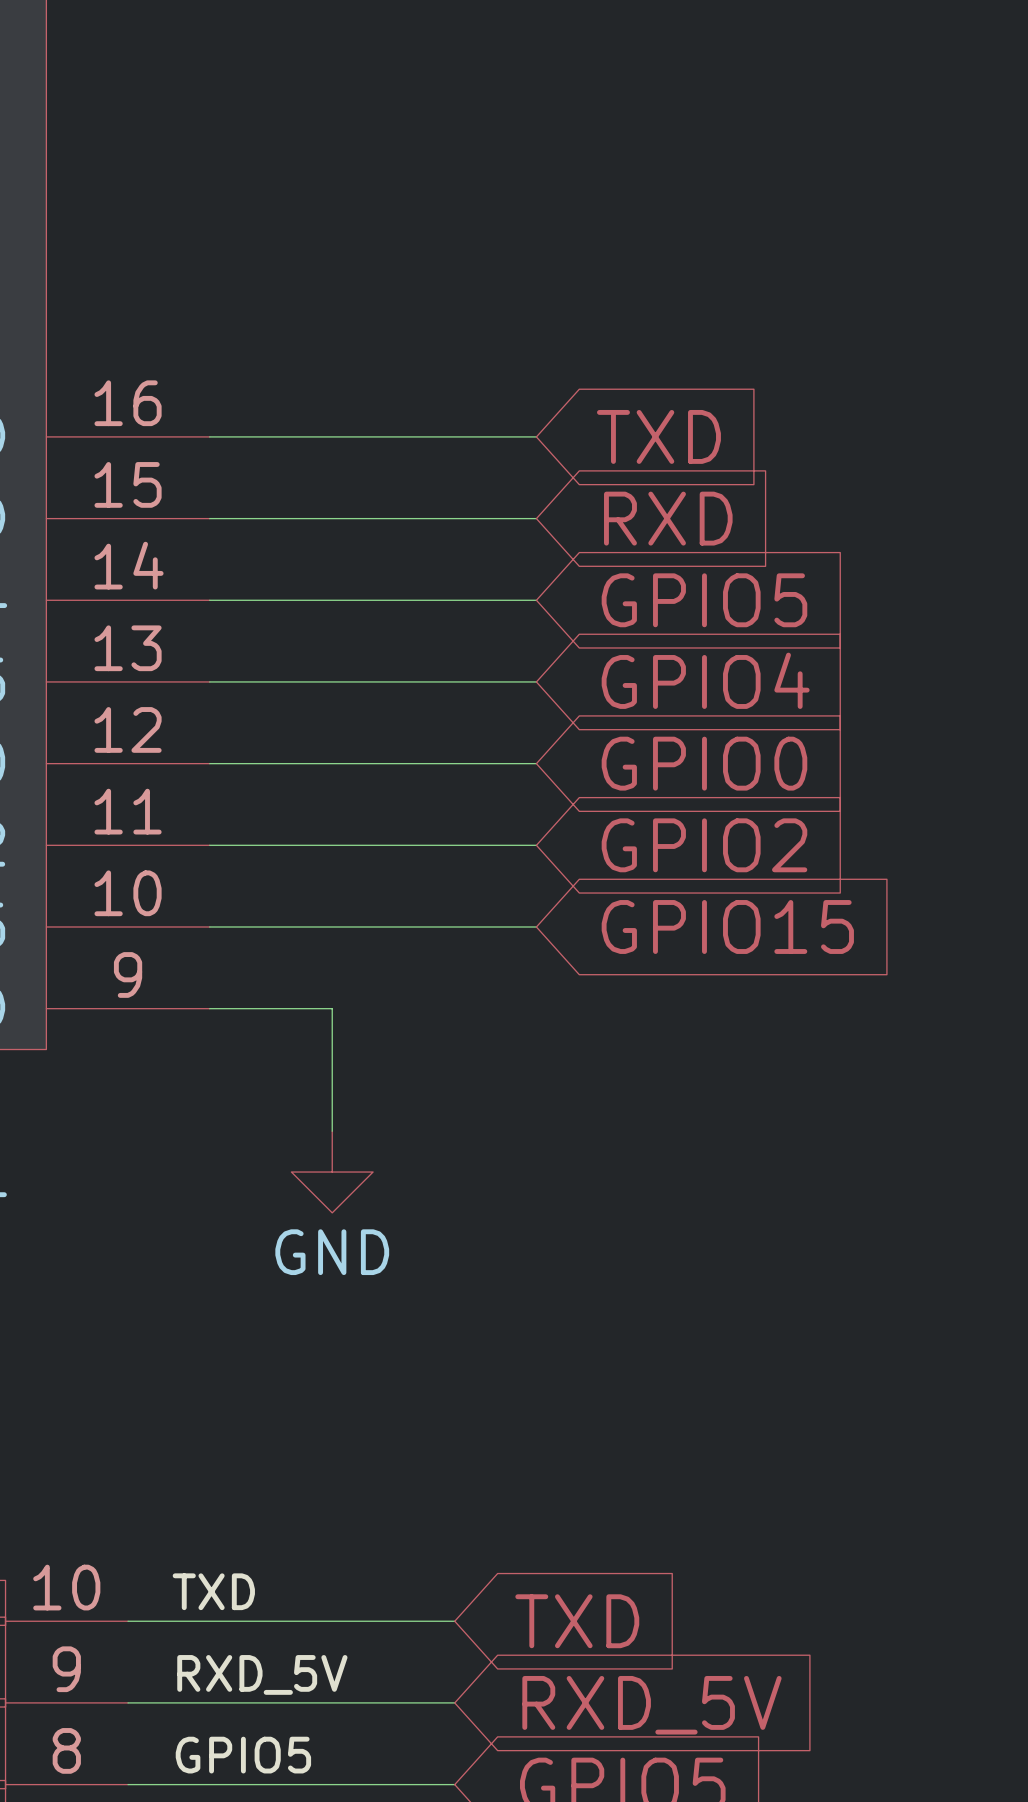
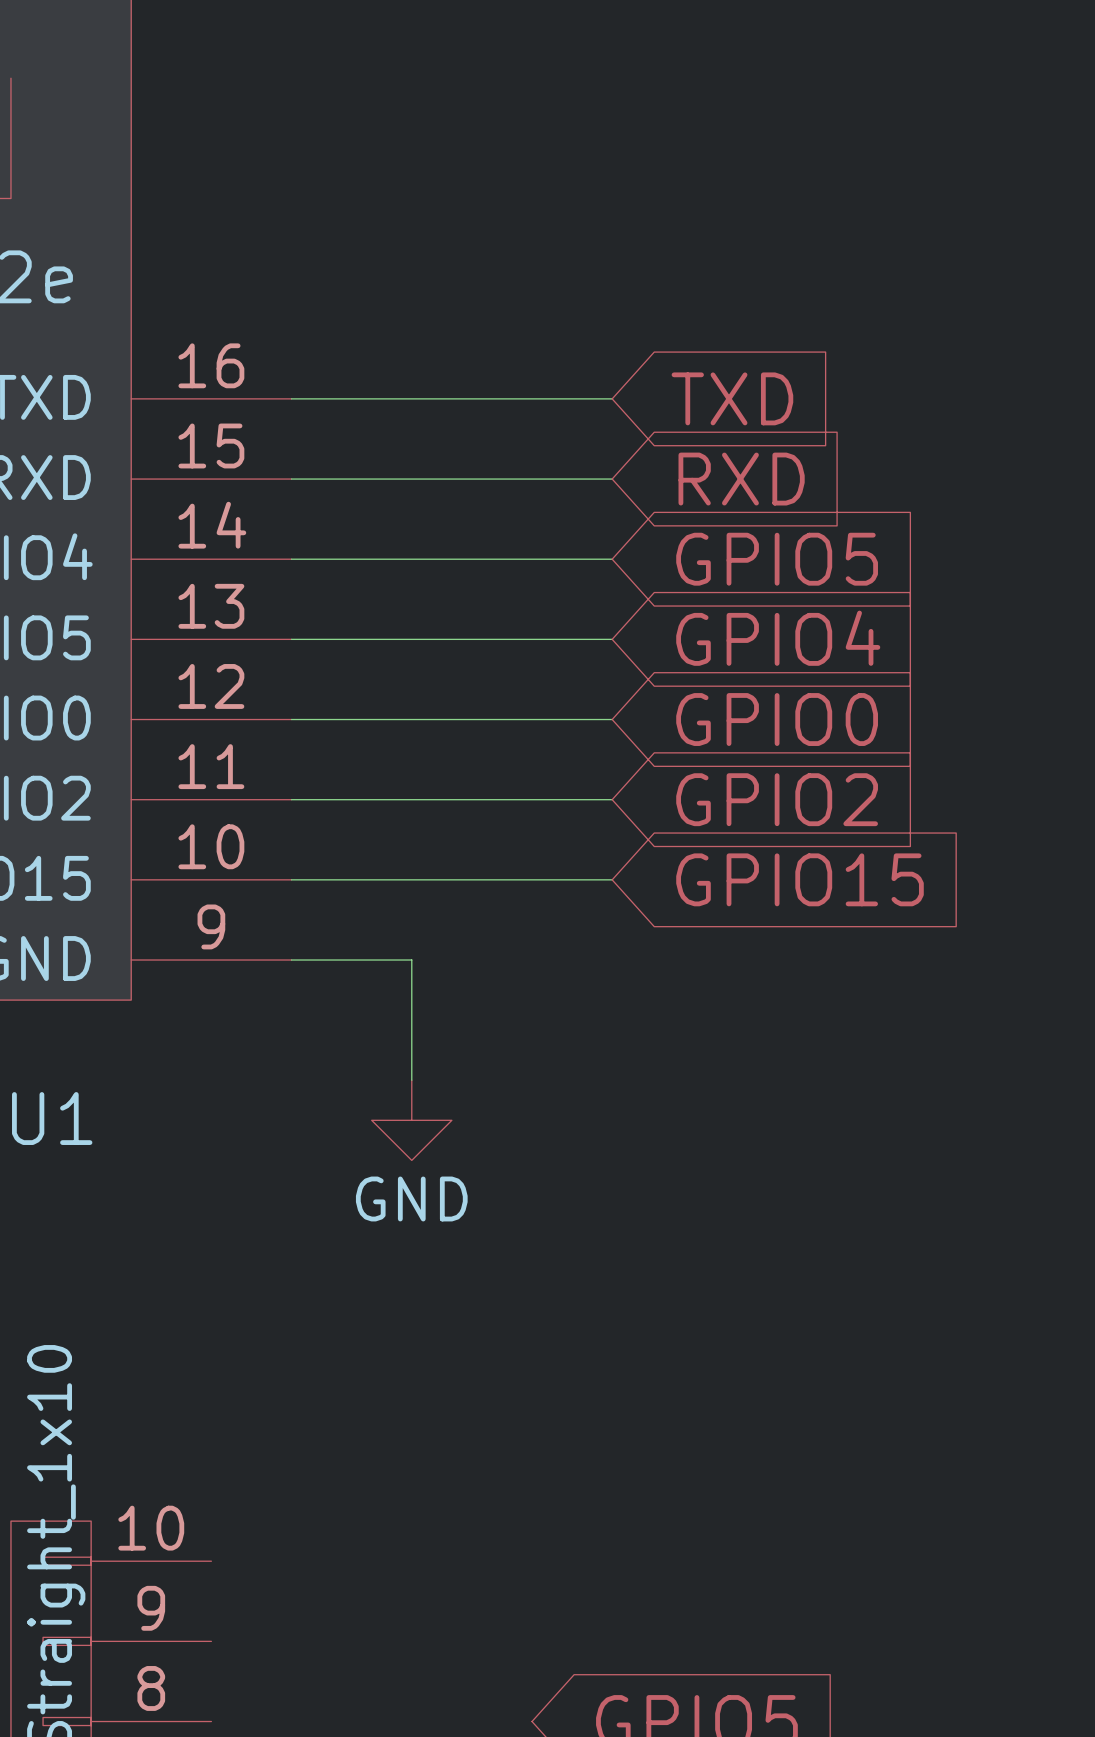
label: TXD (213, 1591) -> none
wire: (128, 1621) (454, 1621) -> none
global label: TXD (577, 1621) -> none
label: RXD_5V (262, 1674) -> none
wire: (128, 1702) (454, 1702) -> none
global label: RXD_5V (651, 1705) -> none
label: GPIO5 (243, 1755) -> none
wire: (128, 1784) (454, 1784) -> none

